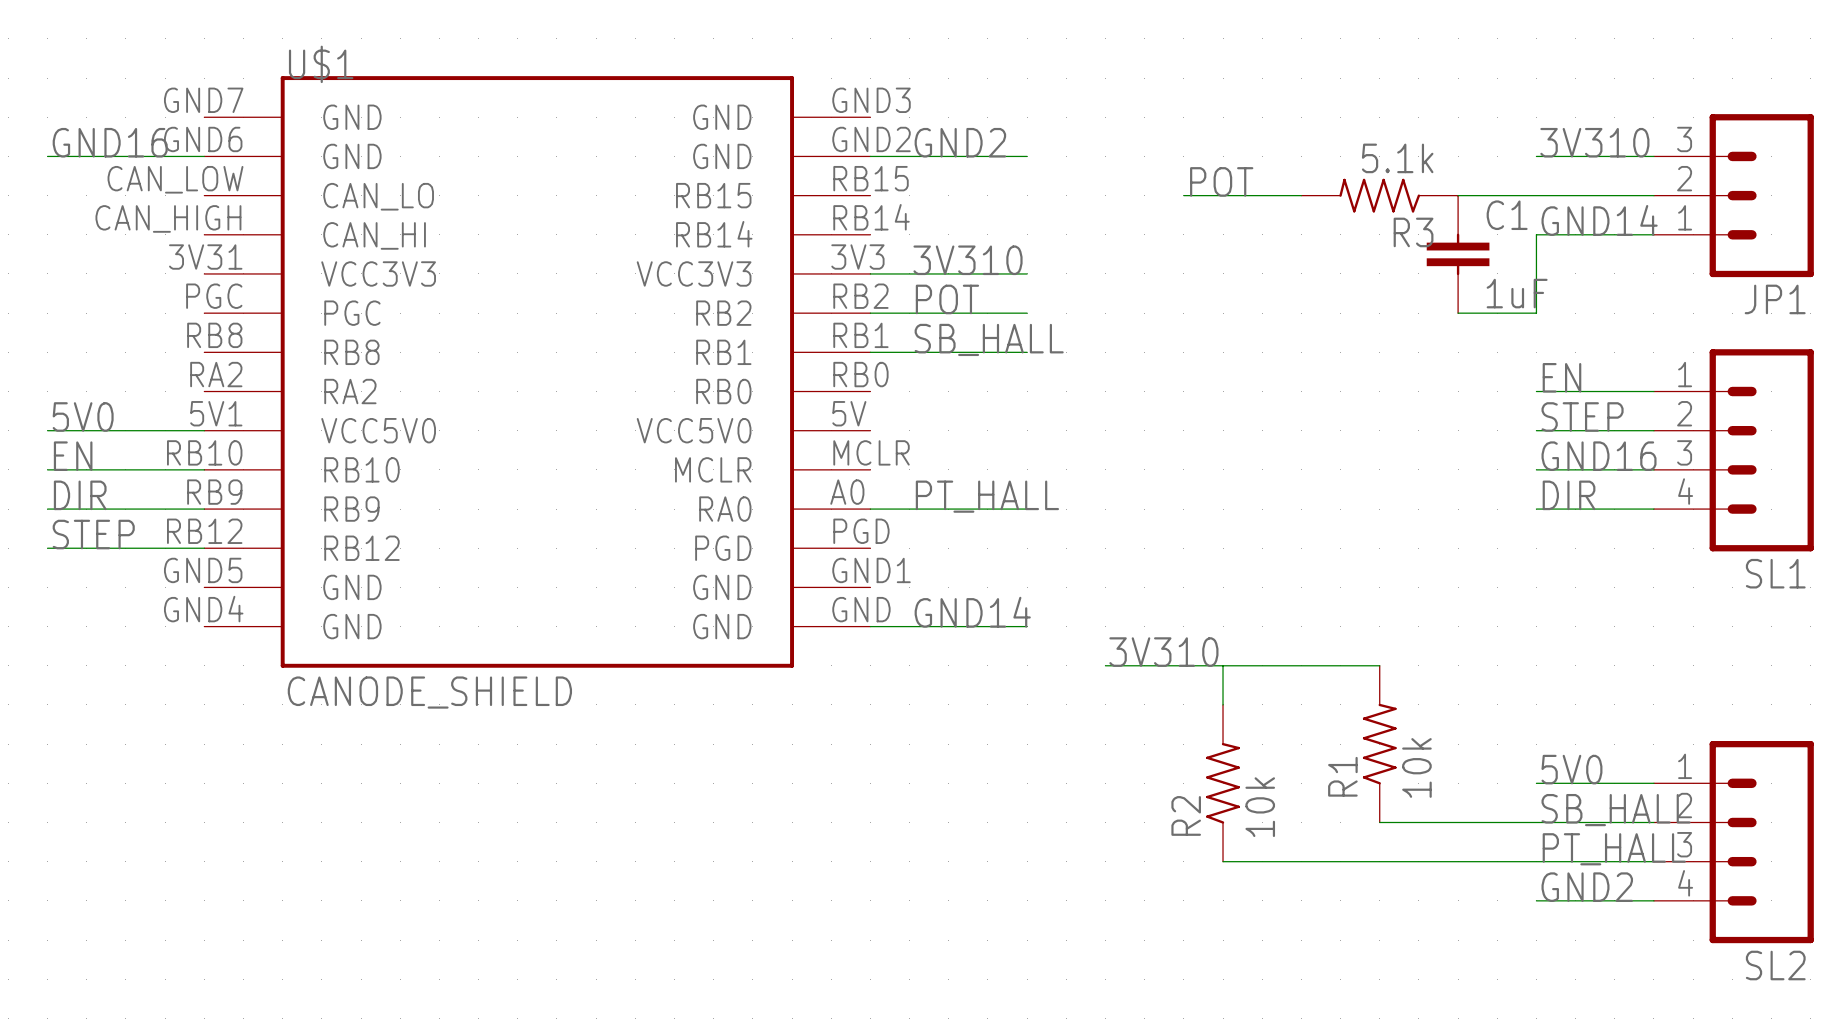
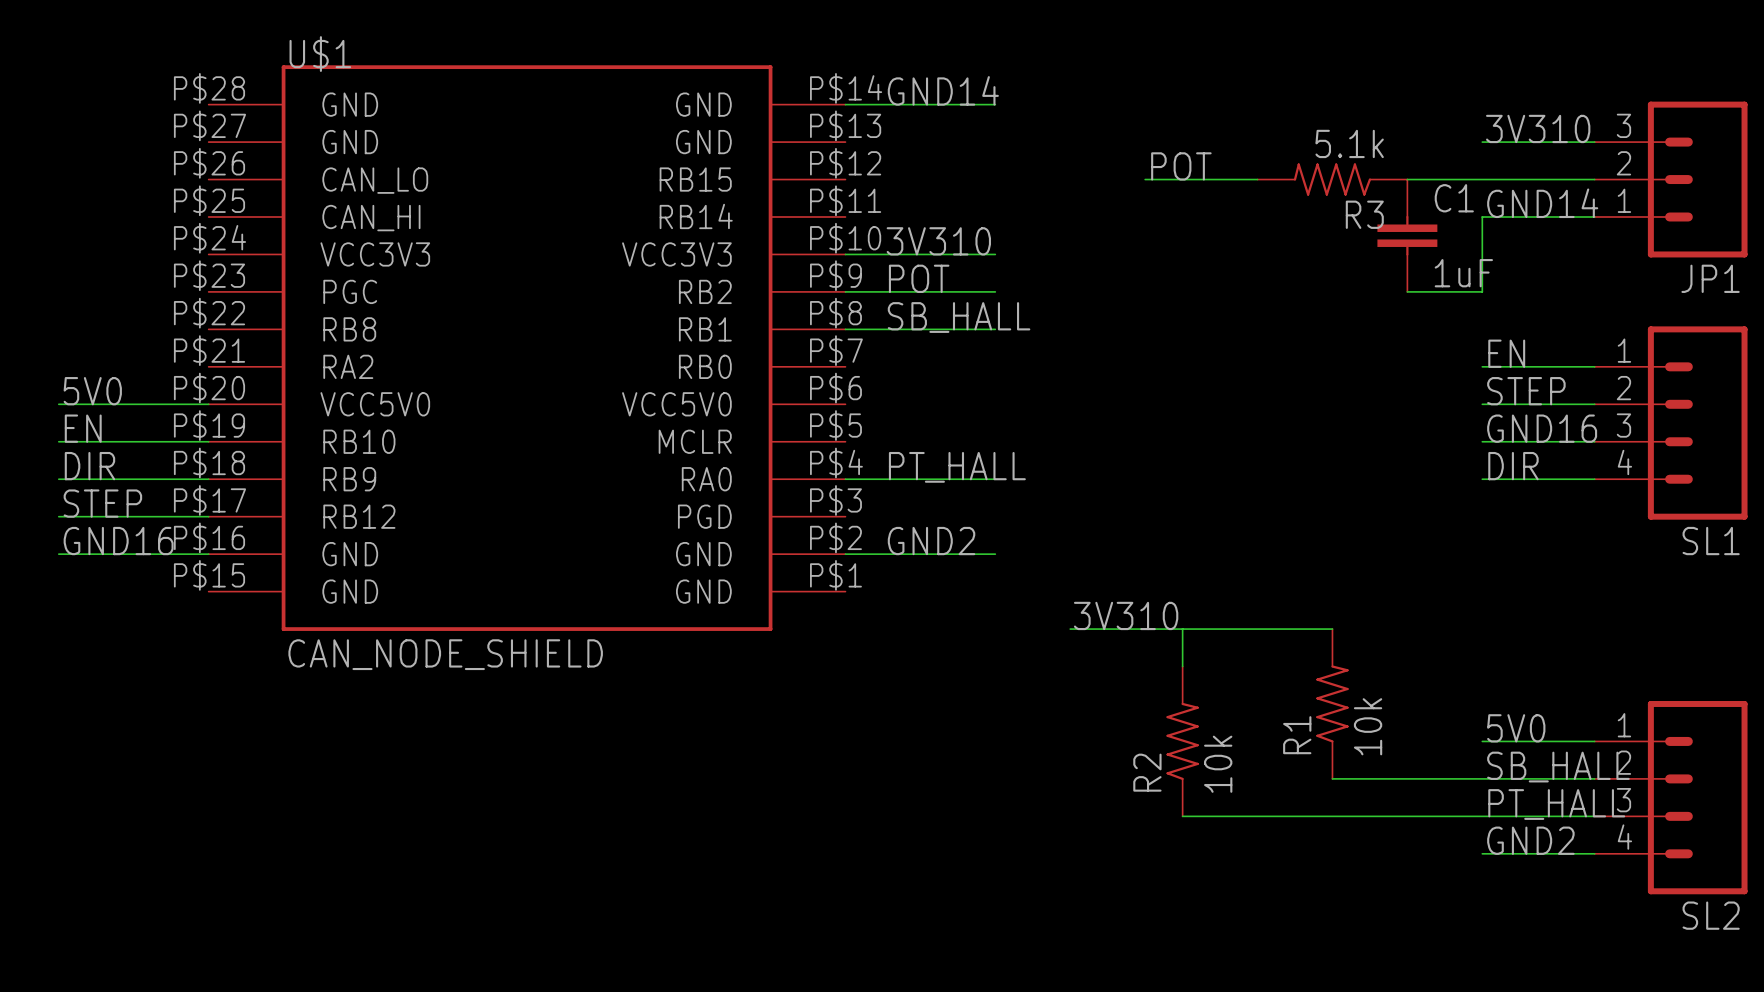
U$1 symbol: [204, 76, 871, 668] -> [208, 65, 846, 631]
label: GND16 (110, 142) -> none
label: GND2 (960, 142) -> GND14 (943, 90)
wire: (47, 156) (204, 156) -> none
wire: (870, 156) (1027, 156) -> (845, 104) (995, 104)
label: none -> GND16 (118, 541)
wire: none -> (58, 554) (208, 554)
label: GND14 (972, 612) -> GND2 (931, 541)
wire: (870, 626) (1027, 626) -> (845, 554) (995, 554)
U$1 value: CANODE_SHIELD (429, 692) -> CAN_NODE_SHIELD (445, 654)

